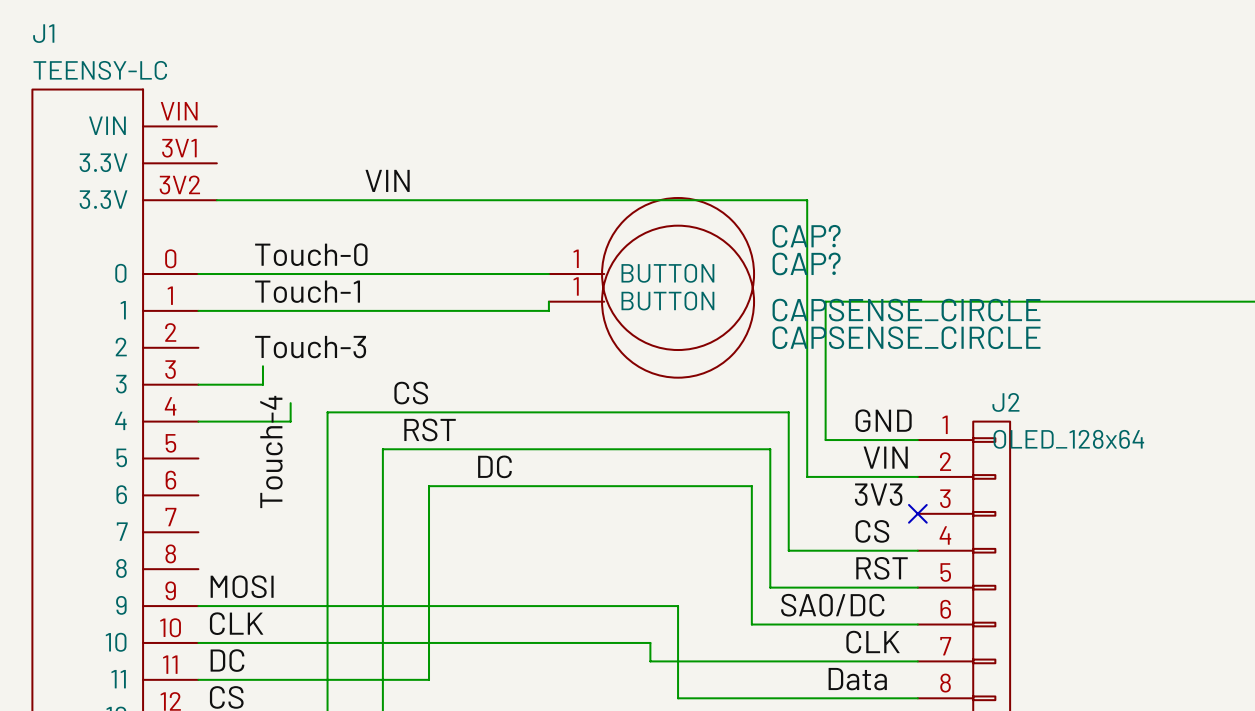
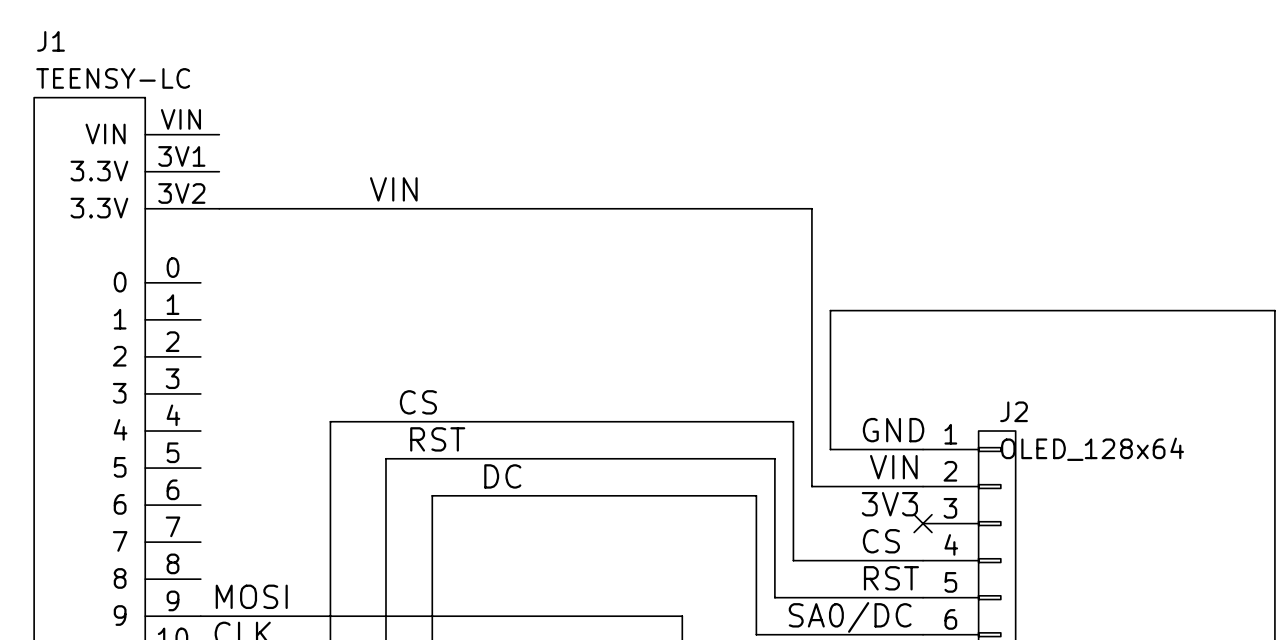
label: Touch-0 (311, 254) -> none
wire: (198, 274) (548, 274) -> none
CAP?: CAPSENSE_CIRCLE (651, 274) -> none
label: Touch-1 (307, 291) -> none
wire: (548, 301) (548, 310) (198, 310) -> none
CAP?: CAPSENSE_CIRCLE (651, 301) -> none
label: Touch-3 (310, 347) -> none
wire: (262, 366) (262, 384) (198, 384) -> none
wire: (290, 403) (290, 421) (198, 421) -> none
label: Touch-4 (271, 451) -> none

